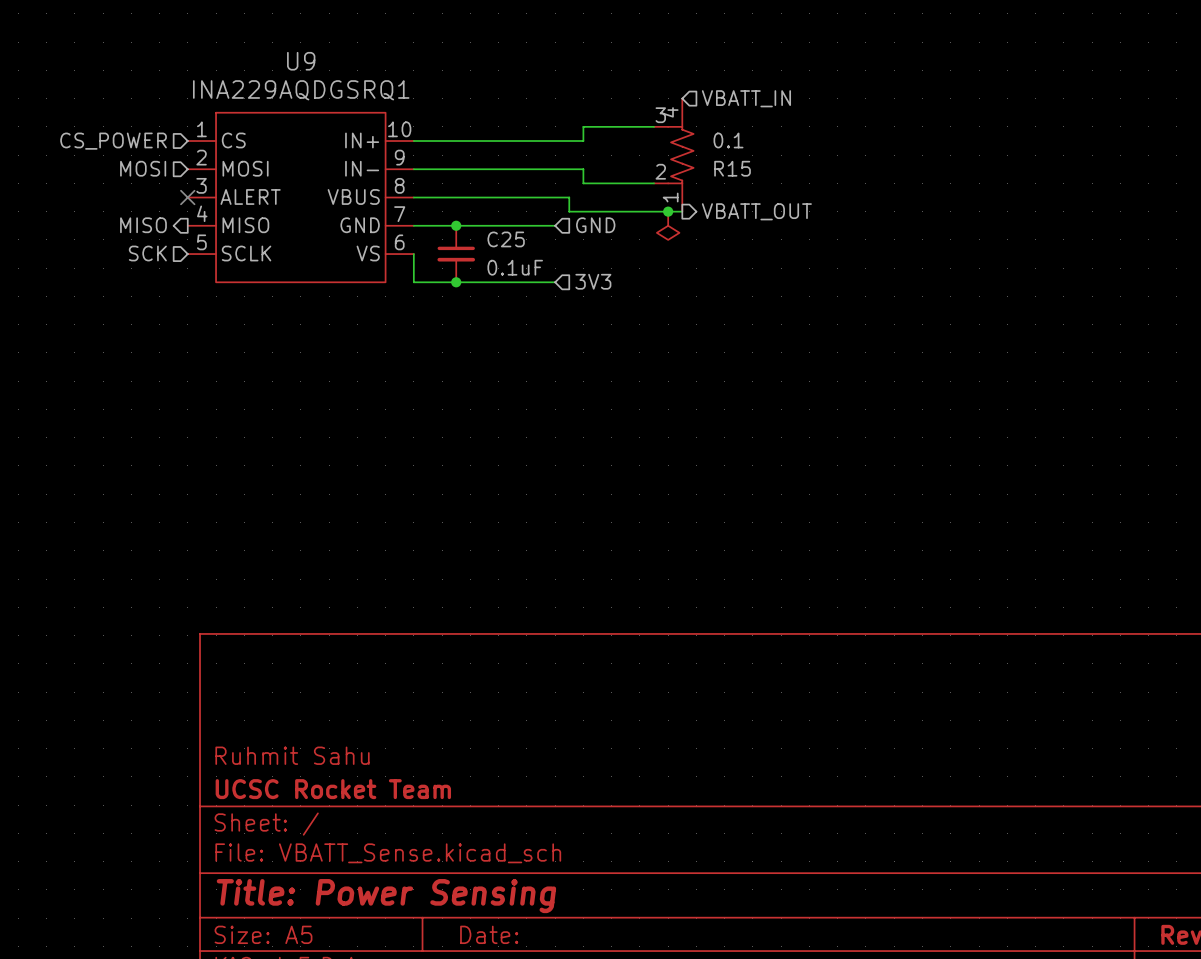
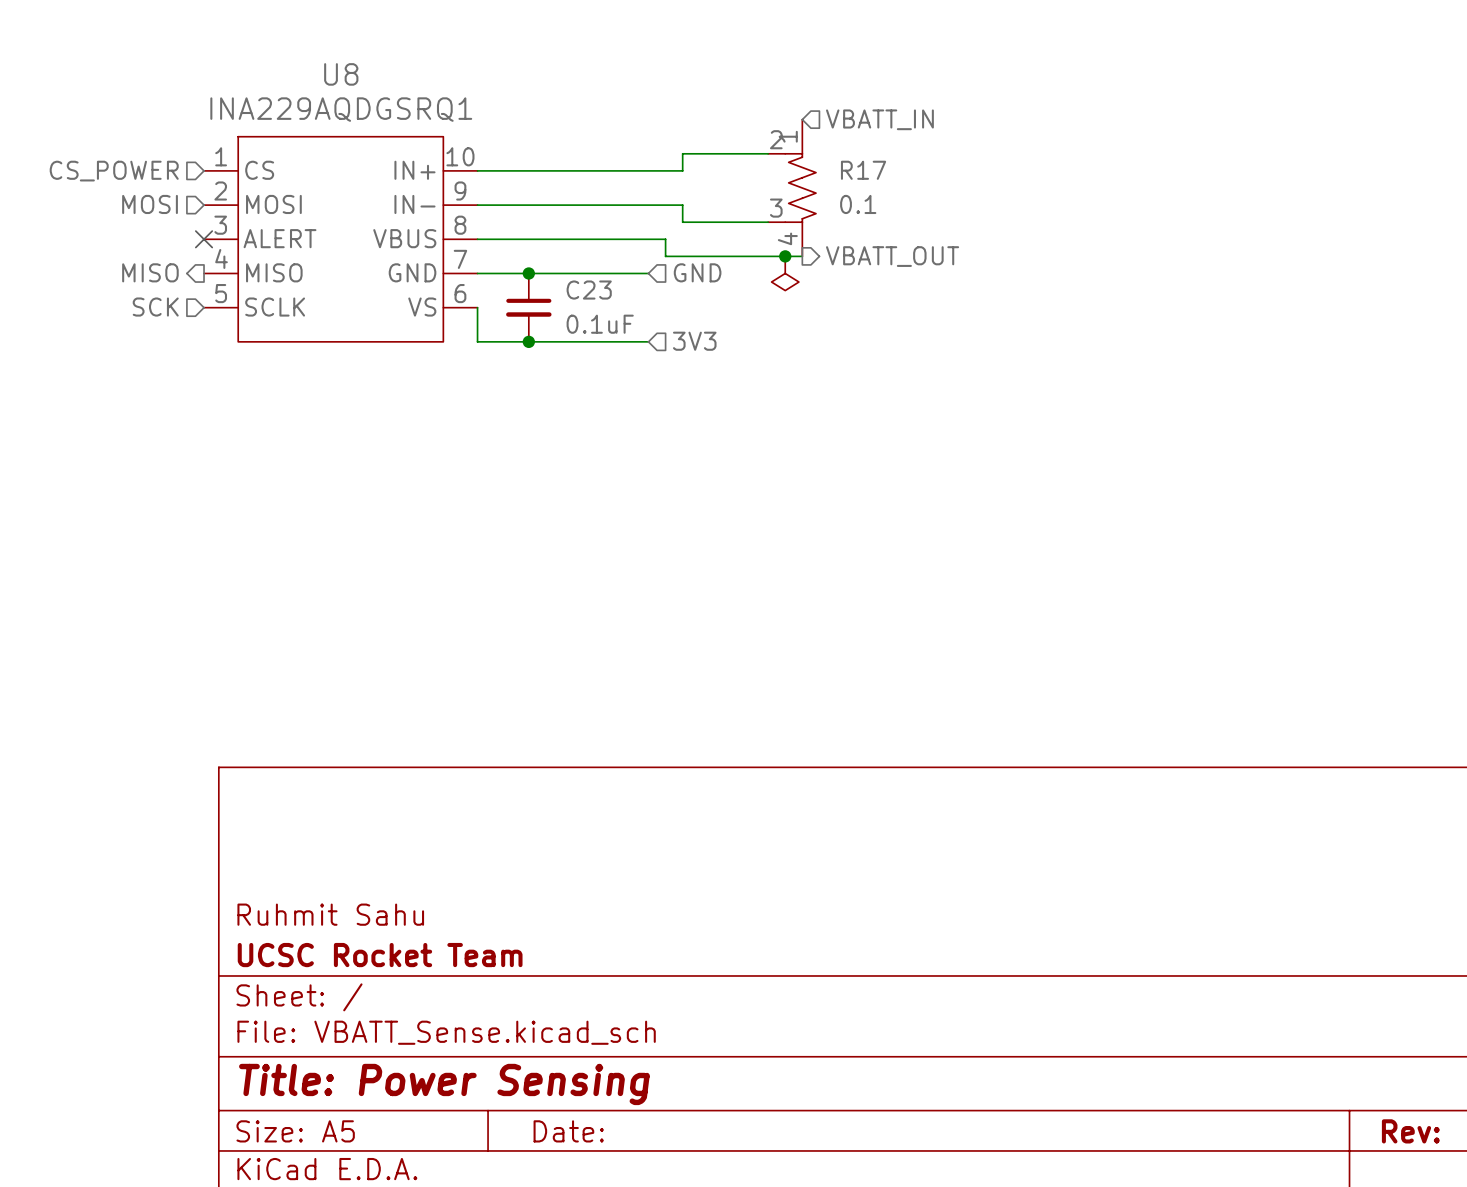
U9 name: U9 (301, 61) -> U8 (341, 74)
R15: 0.1 (673, 155) -> none
R17: none -> 0.1 (792, 188)
C25 name: C25 (506, 239) -> C23 (589, 290)

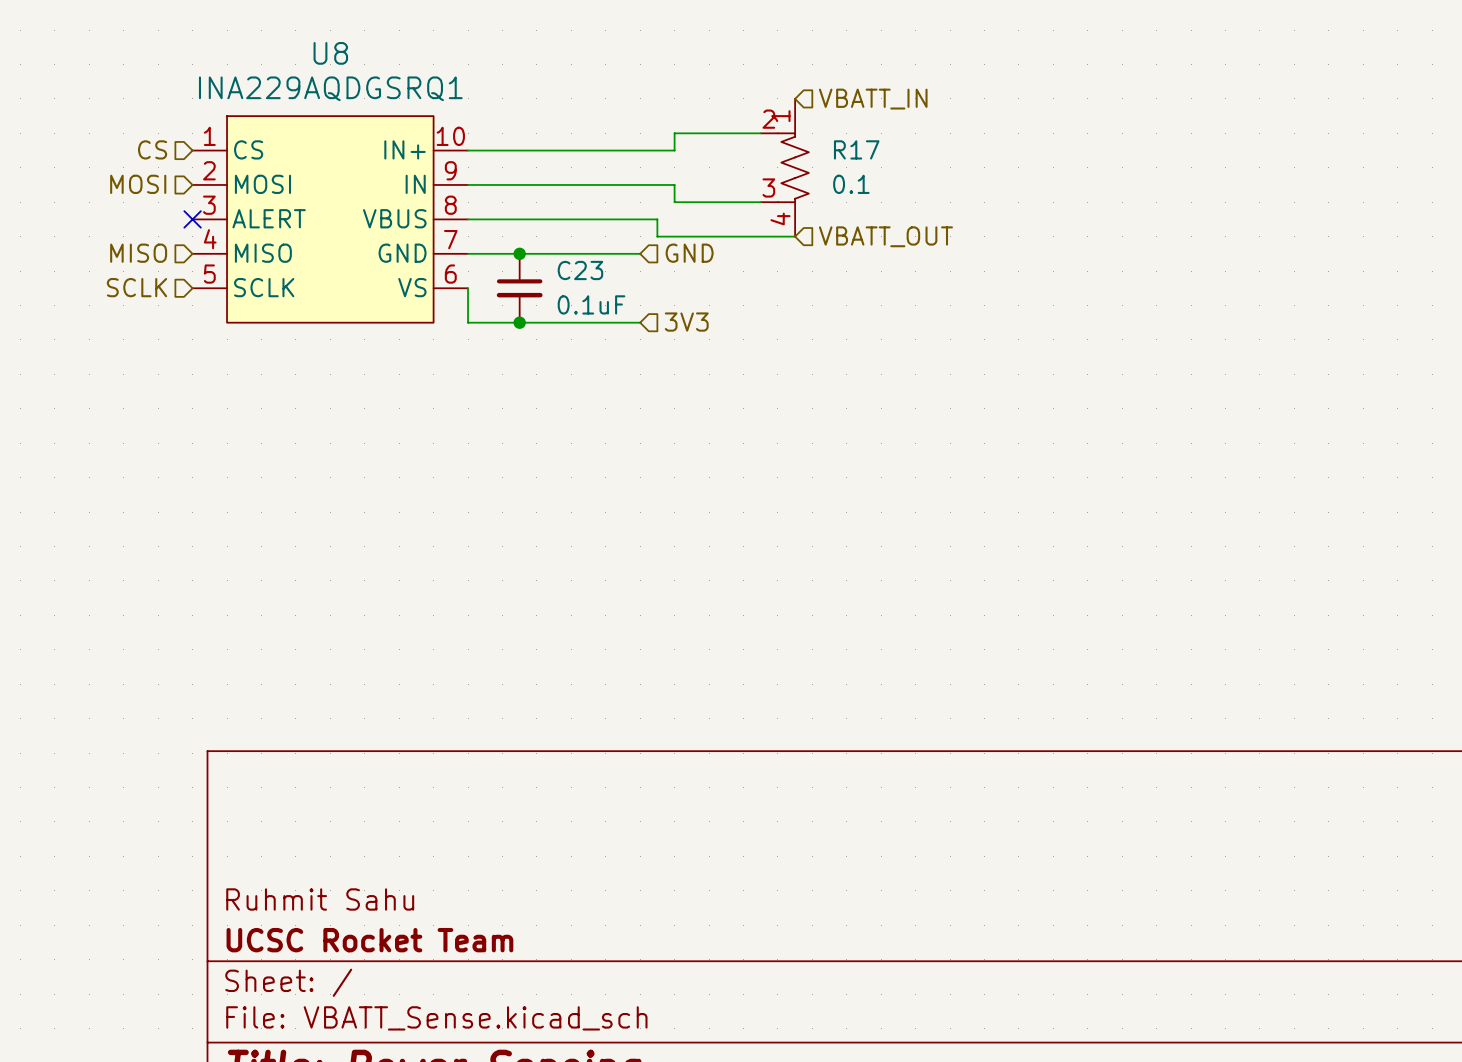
hierarchical label: CS_POWER (114, 171) -> CS (152, 149)
U8 pin name: IN- (414, 204) -> IN (415, 184)
junction: (785, 256) -> none
hierarchical label shape: output (892, 256) -> input (885, 236)
hierarchical label shape: output (150, 272) -> input (138, 253)
power symbol: (785, 273) -> none
hierarchical label: SCK (155, 307) -> SCLK (136, 287)

